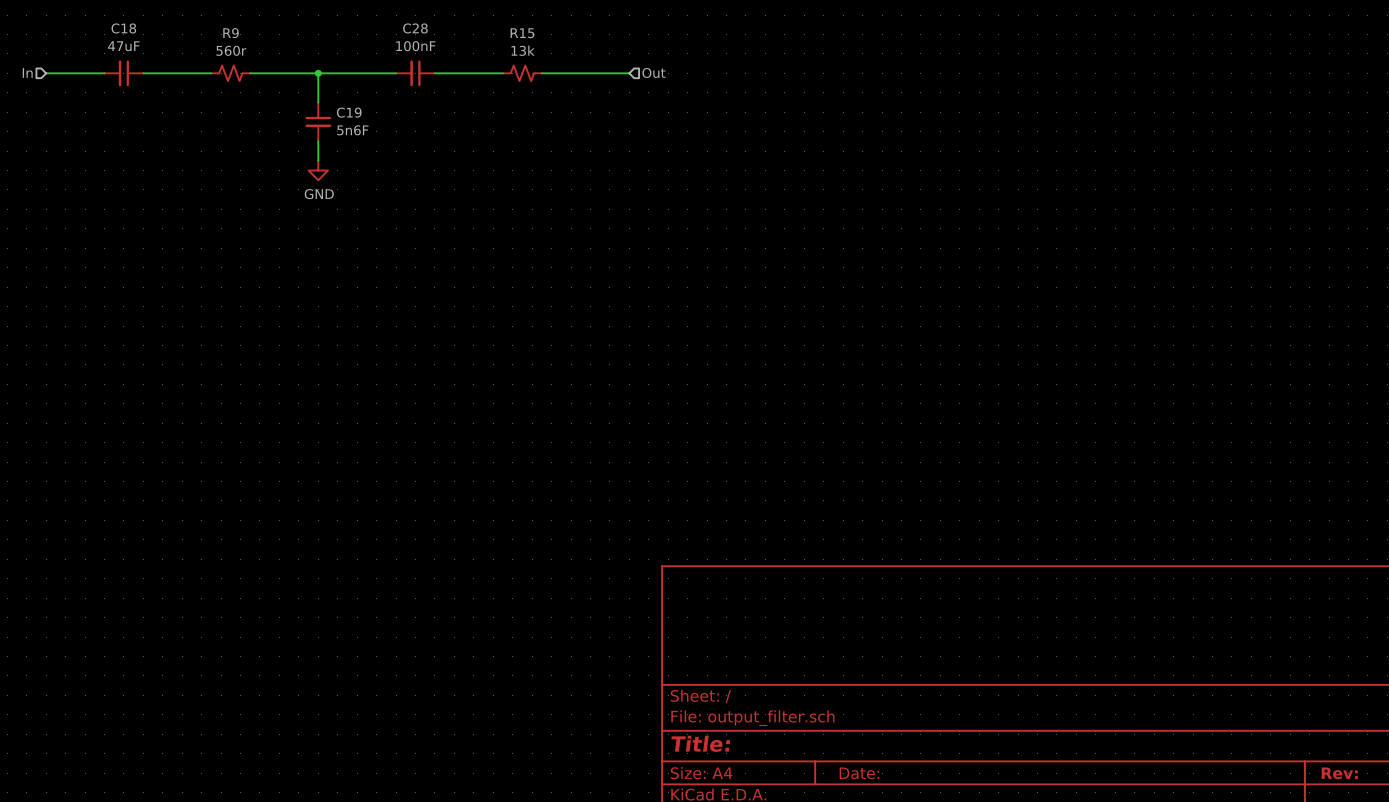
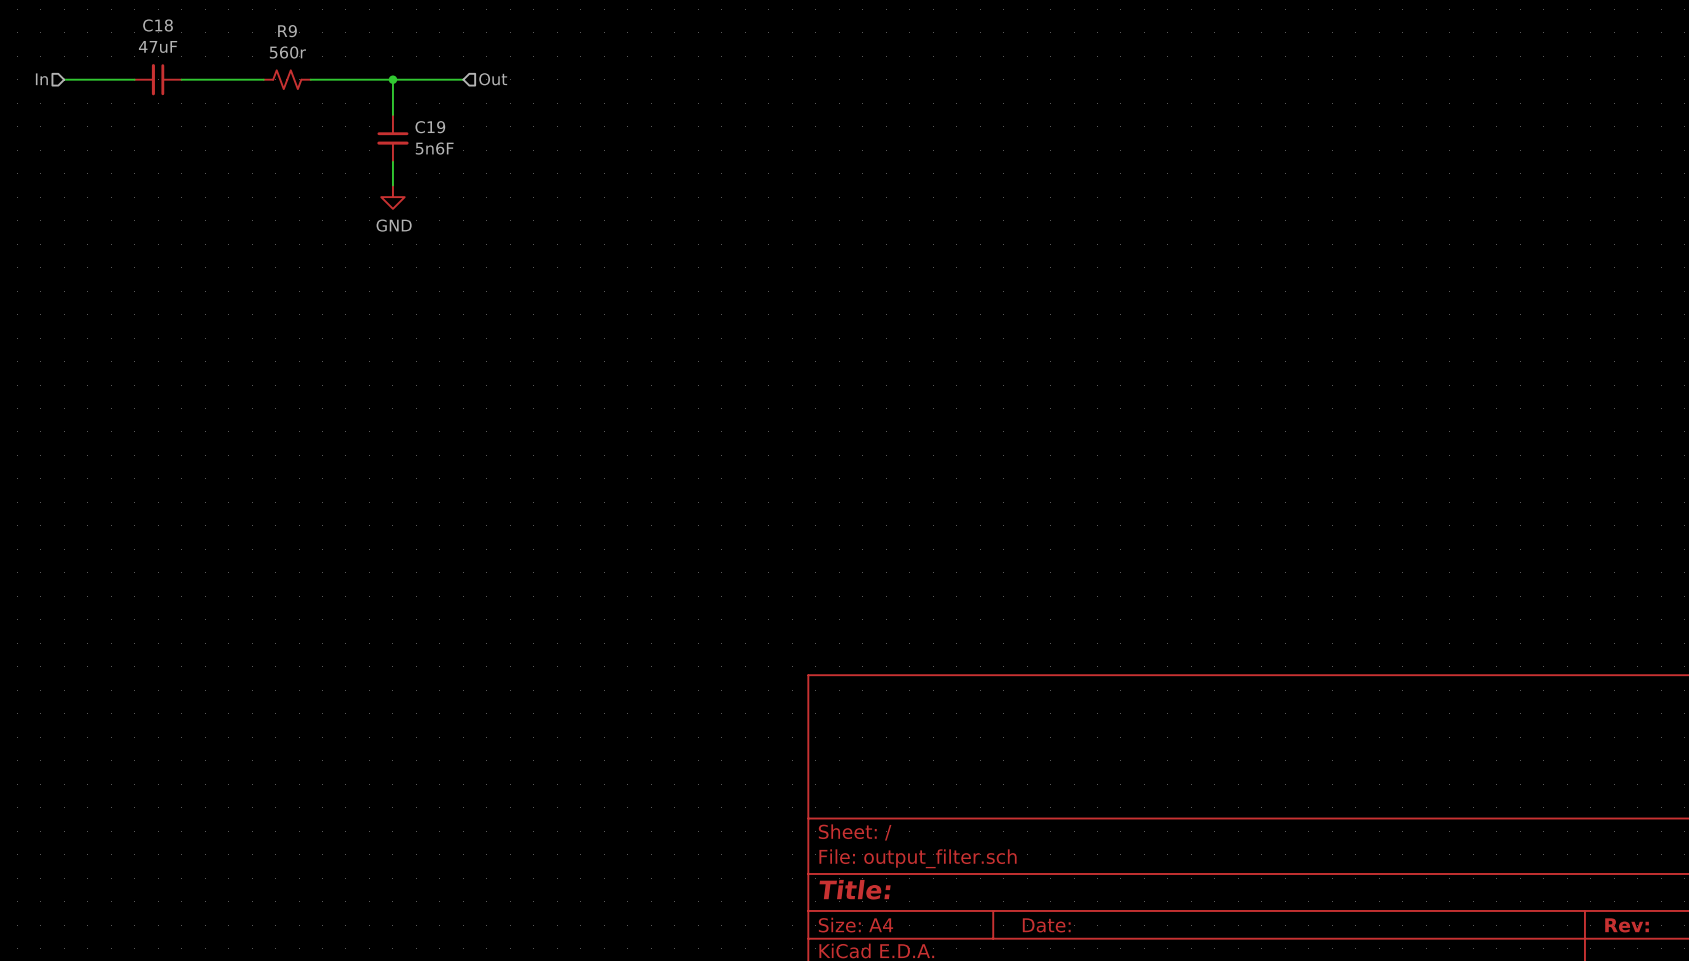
hierarchical label: none -> Out (493, 79)
hierarchical label: Out (653, 72) -> none
wire: (376, 73) (396, 73) -> none
C28: 100nF (415, 73) -> none
wire: (434, 73) (502, 73) -> none
R15: 13k (522, 73) -> none
wire: (541, 73) (629, 73) -> none

